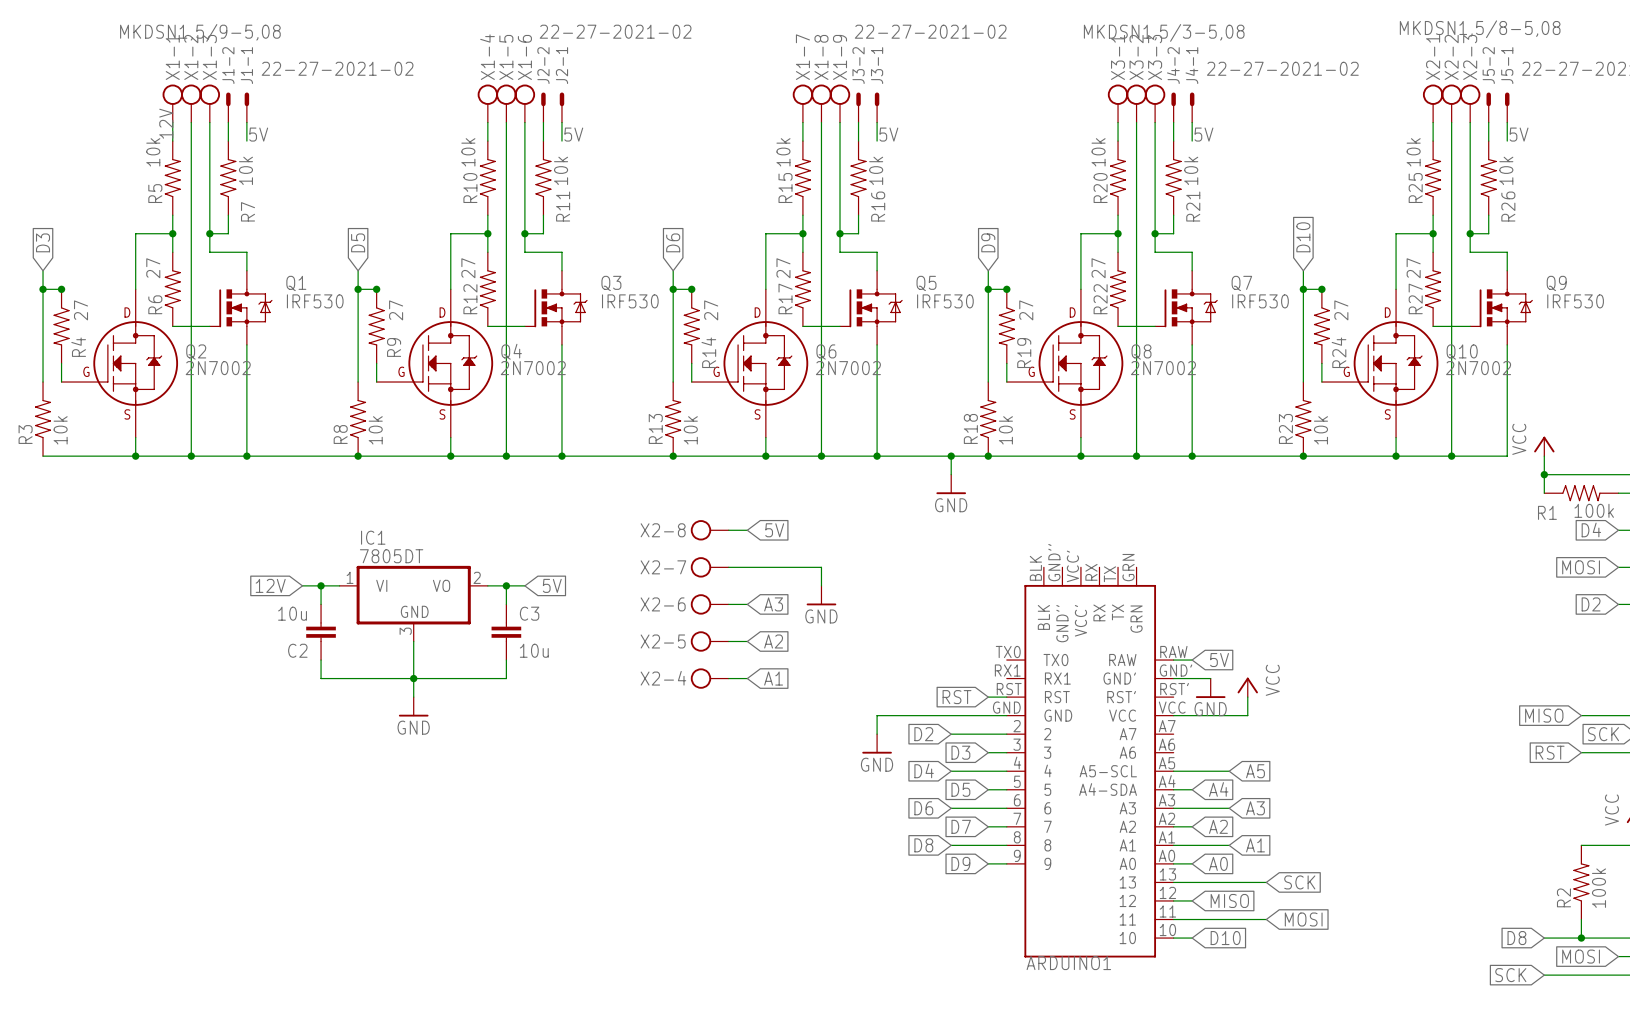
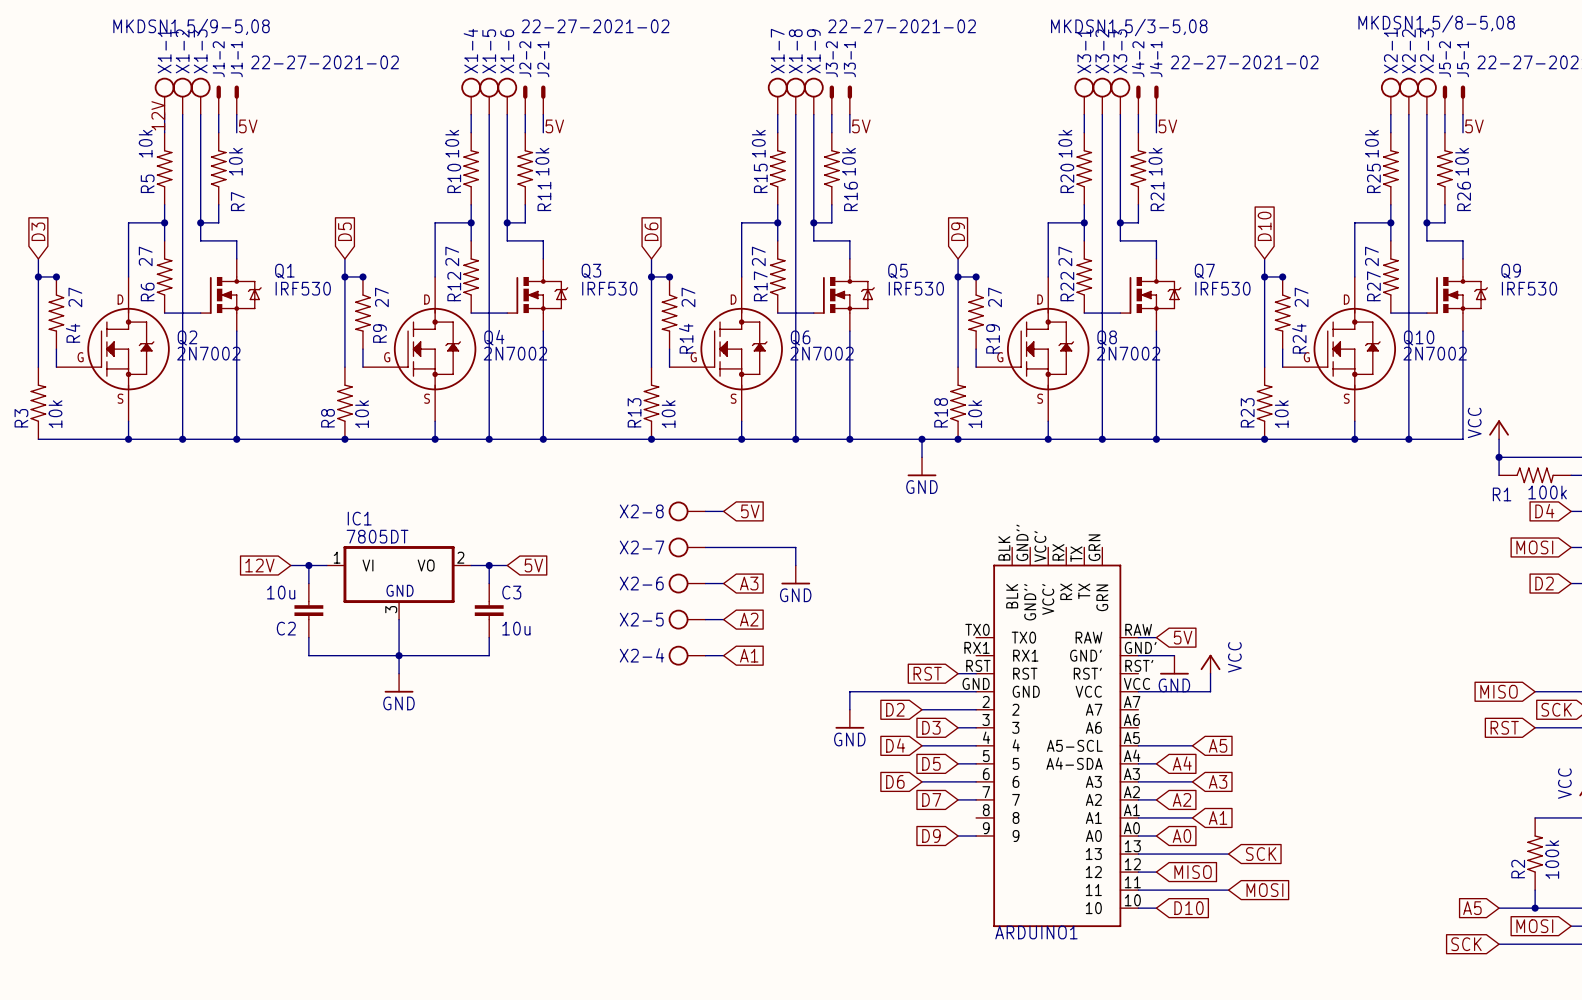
global label: D8 (923, 845) -> none
wire: (951, 845) (1006, 845) -> none
global label: D8 (1516, 938) -> A5 (1472, 908)

